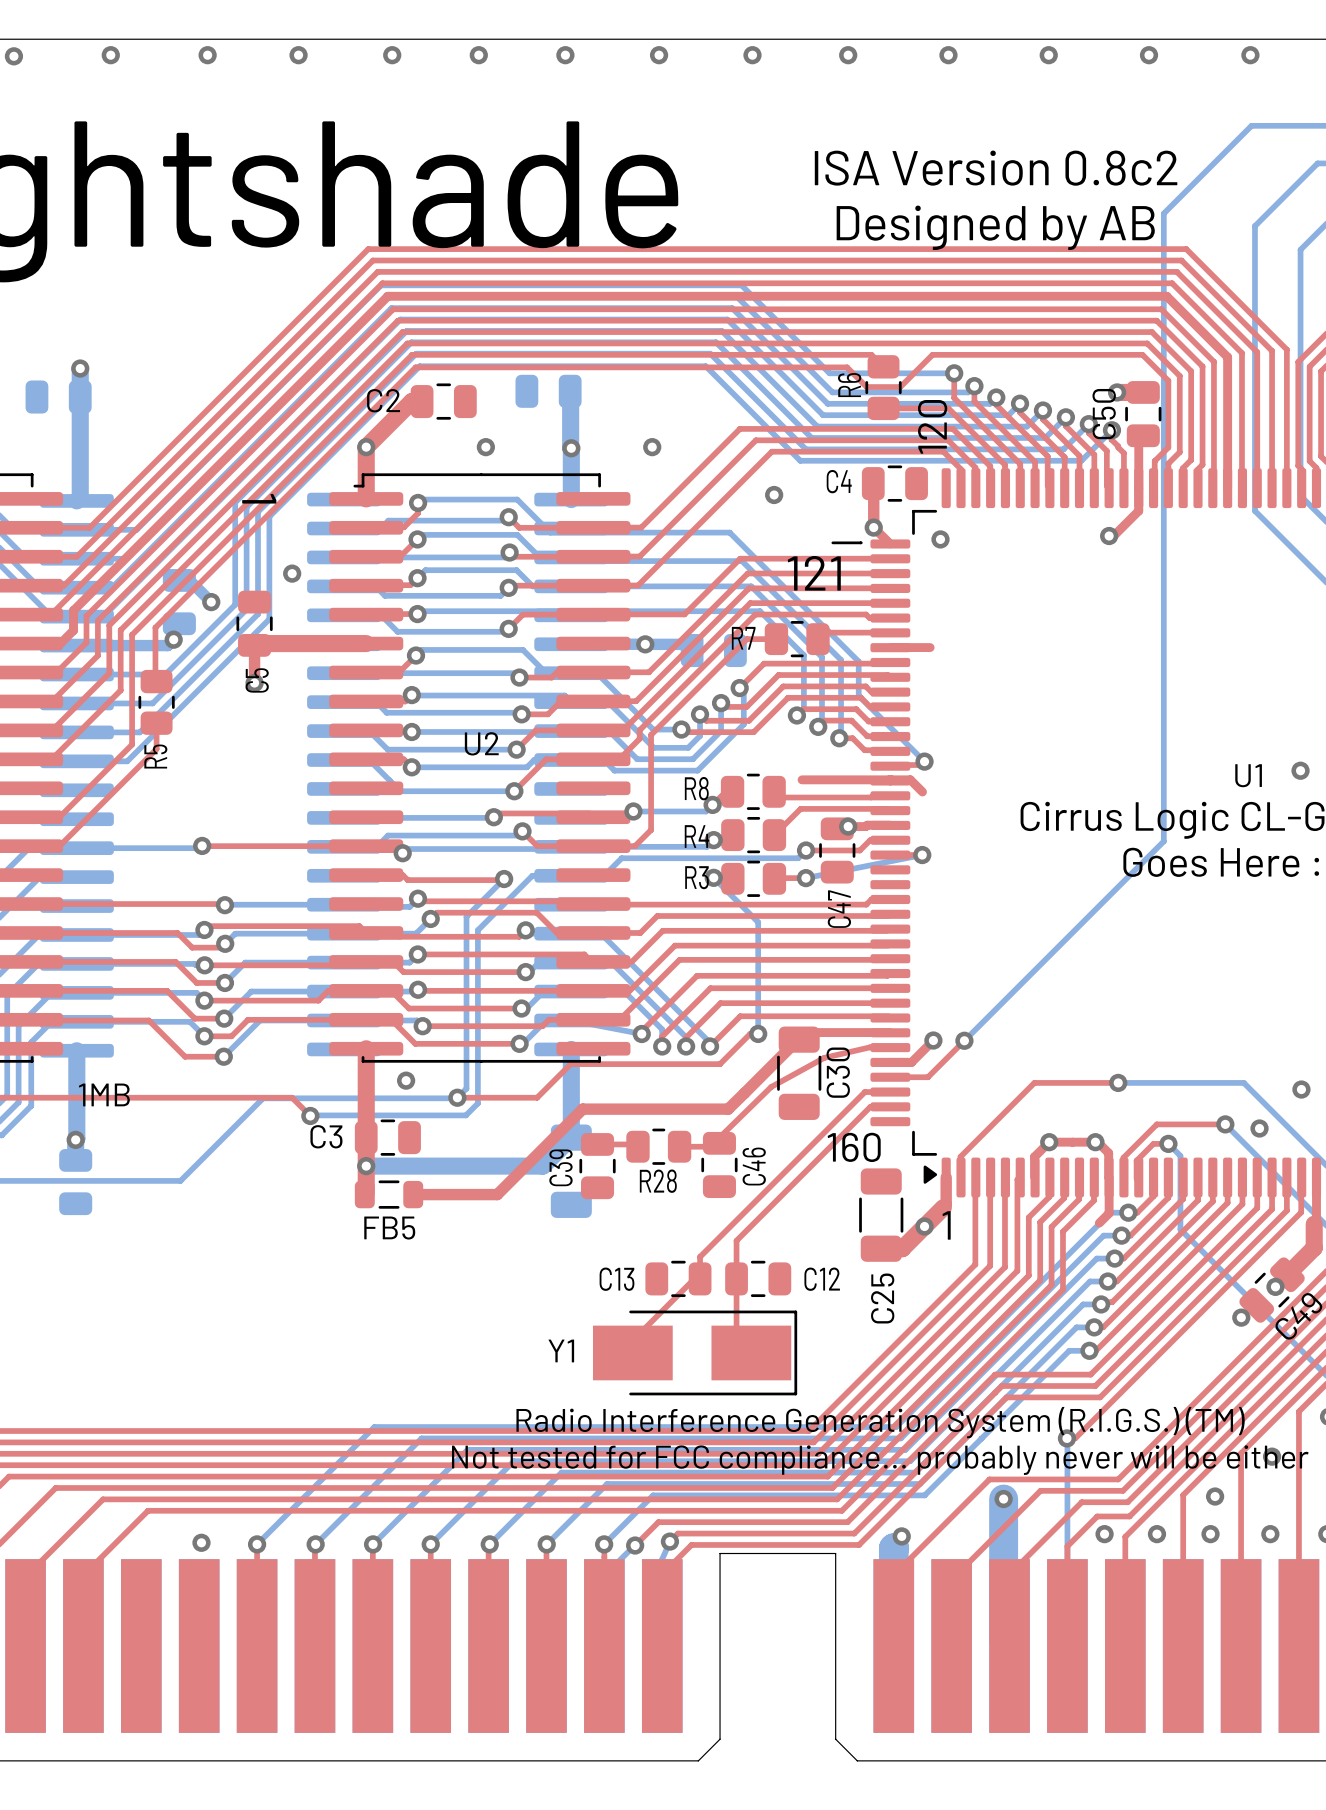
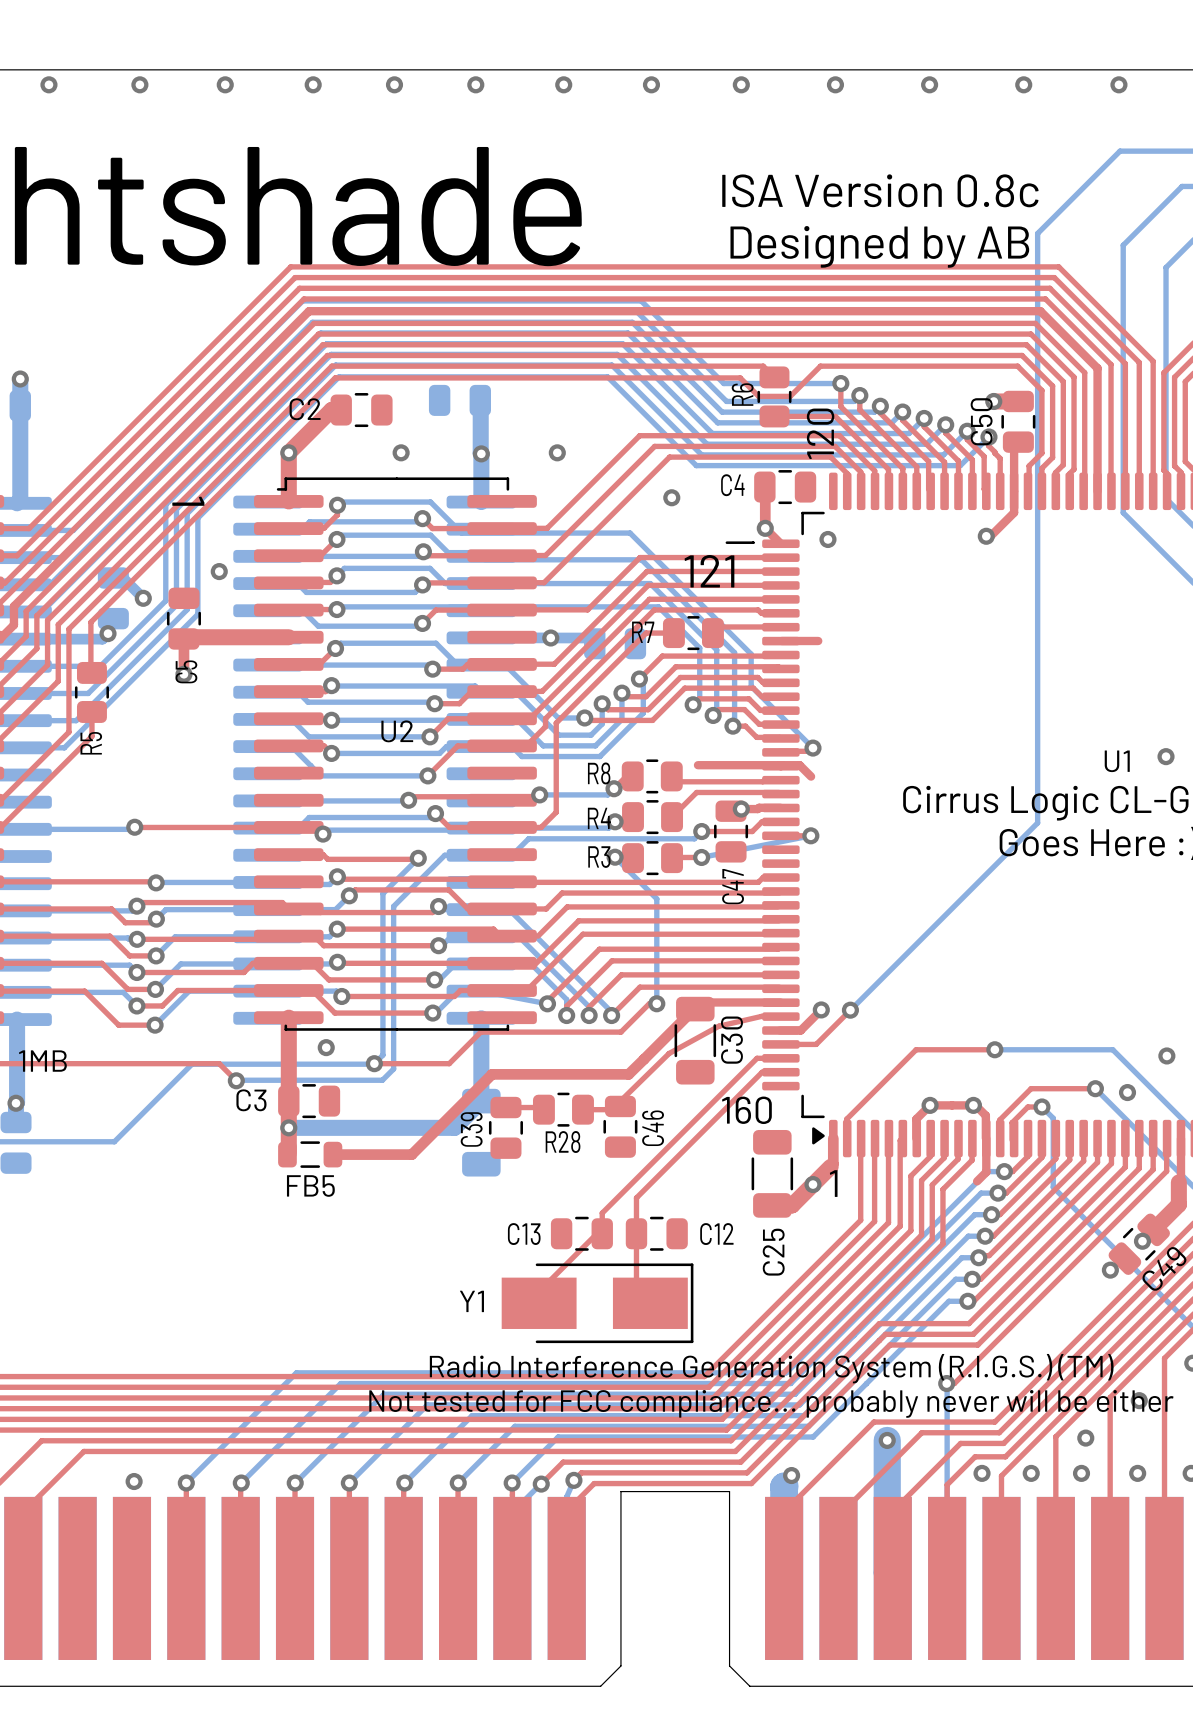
text: ISA Version 0.8c2 (996, 168) -> ISA Version 0.8c (880, 190)

